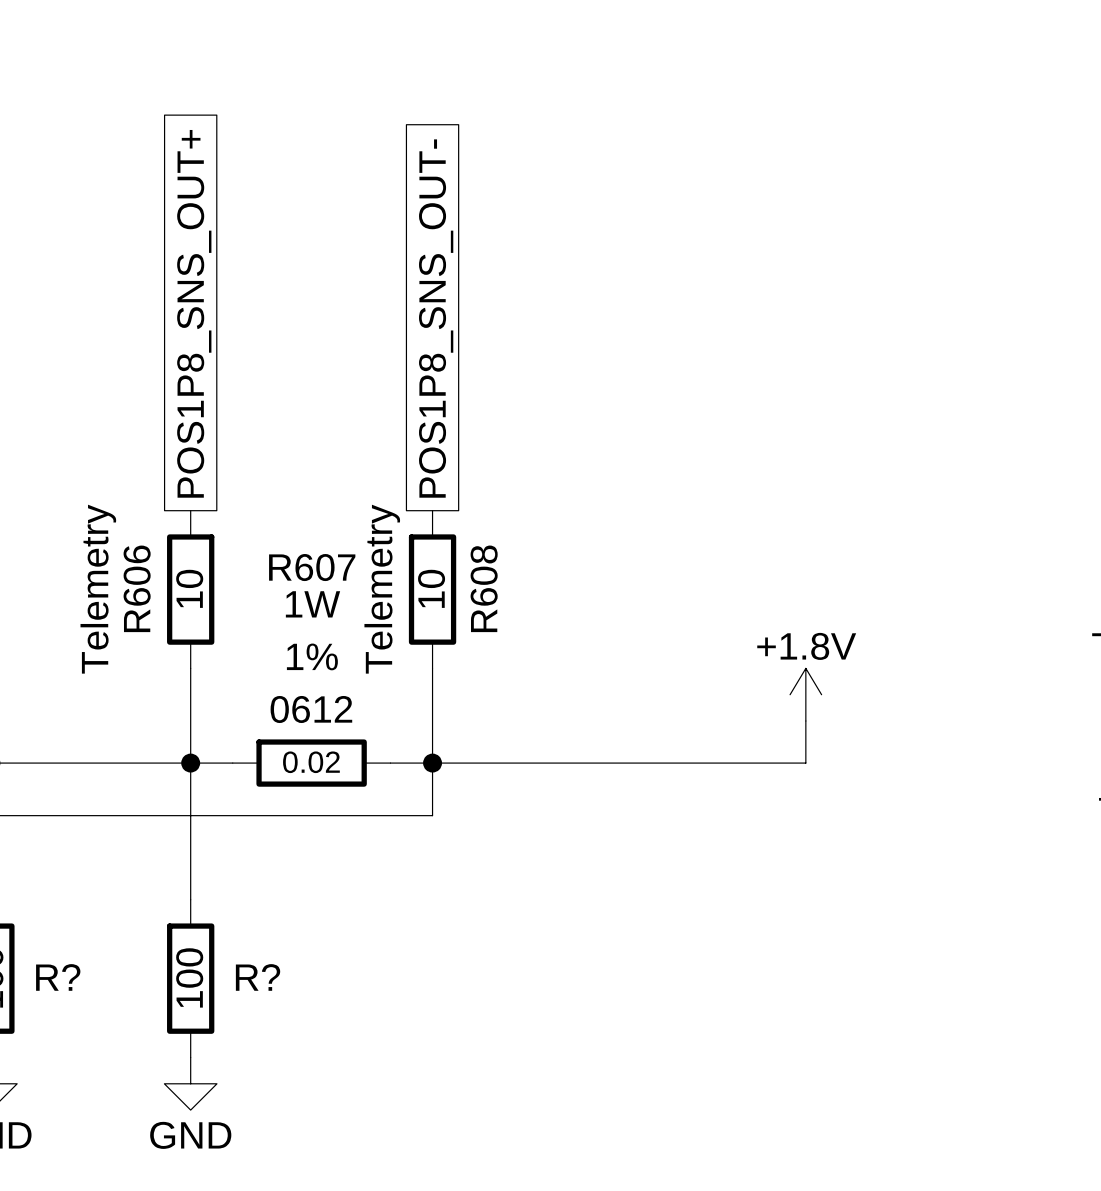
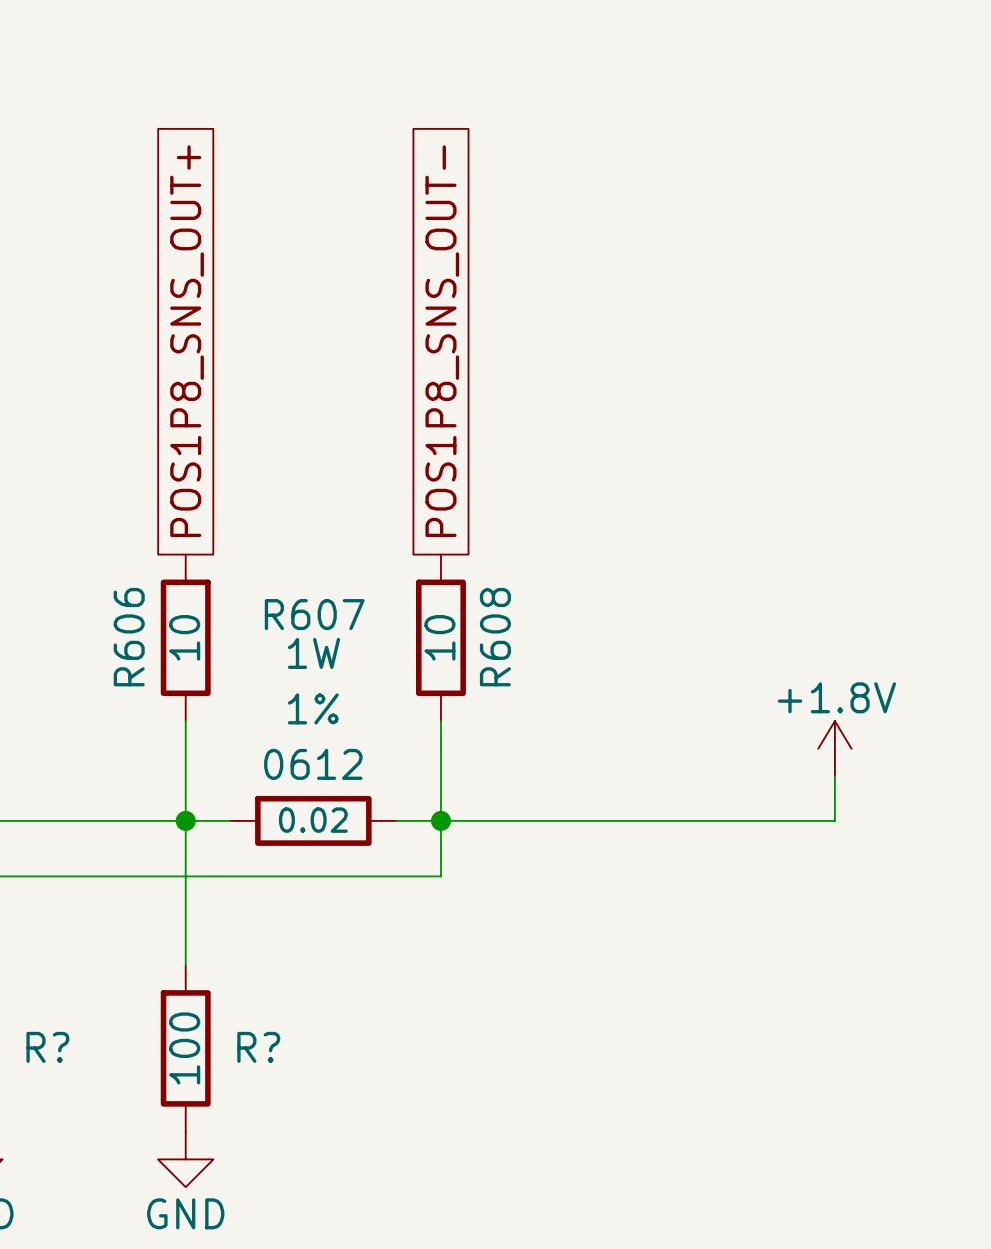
R606 text: Telemetry (98, 589) -> none
R608 text: Telemetry (382, 589) -> none

